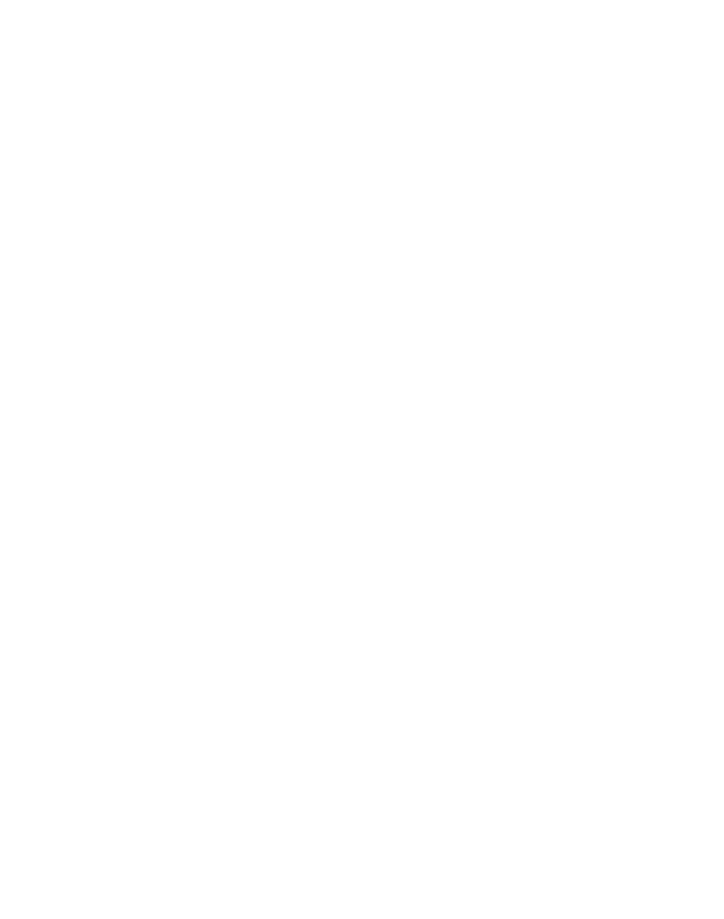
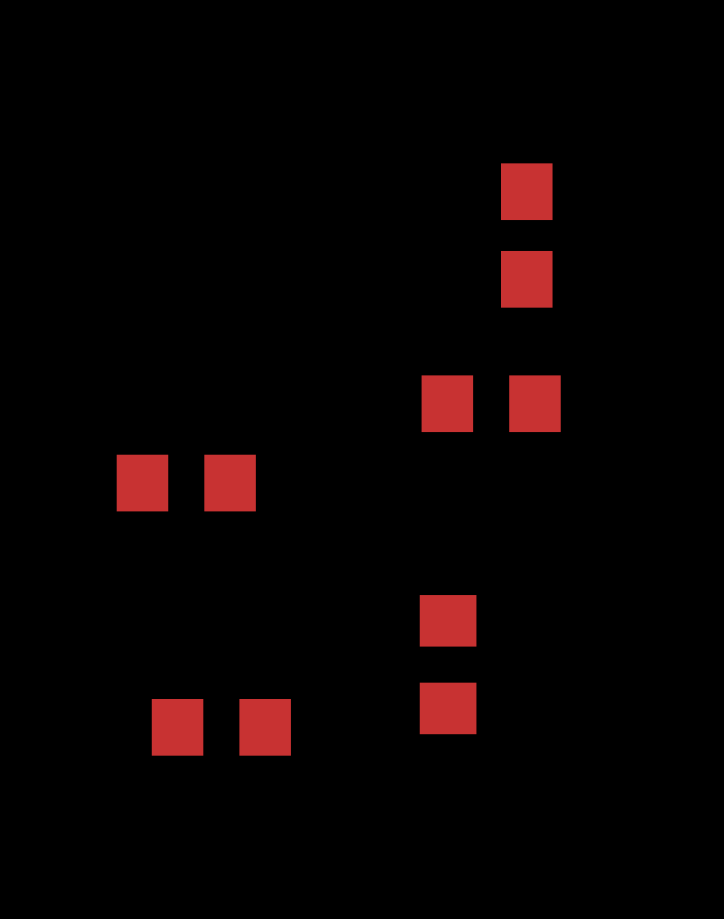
part: none -> (526, 235)
part: none -> (491, 403)
part: none -> (186, 483)
part: none -> (448, 664)
part: none -> (221, 727)

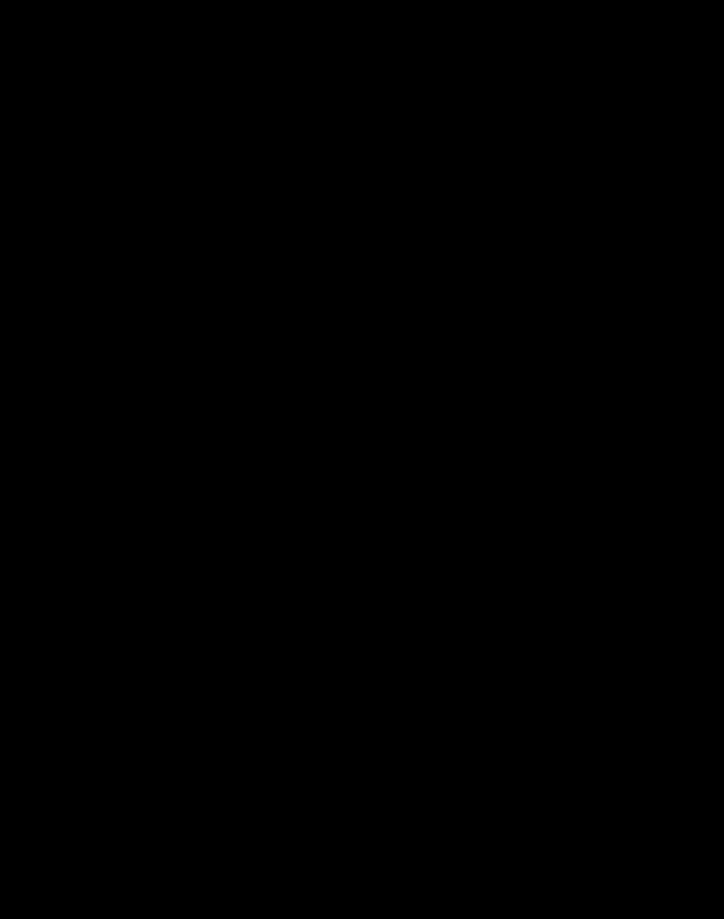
part: (526, 235) -> none
part: (491, 403) -> none
part: (186, 483) -> none
part: (448, 664) -> none
part: (221, 727) -> none

